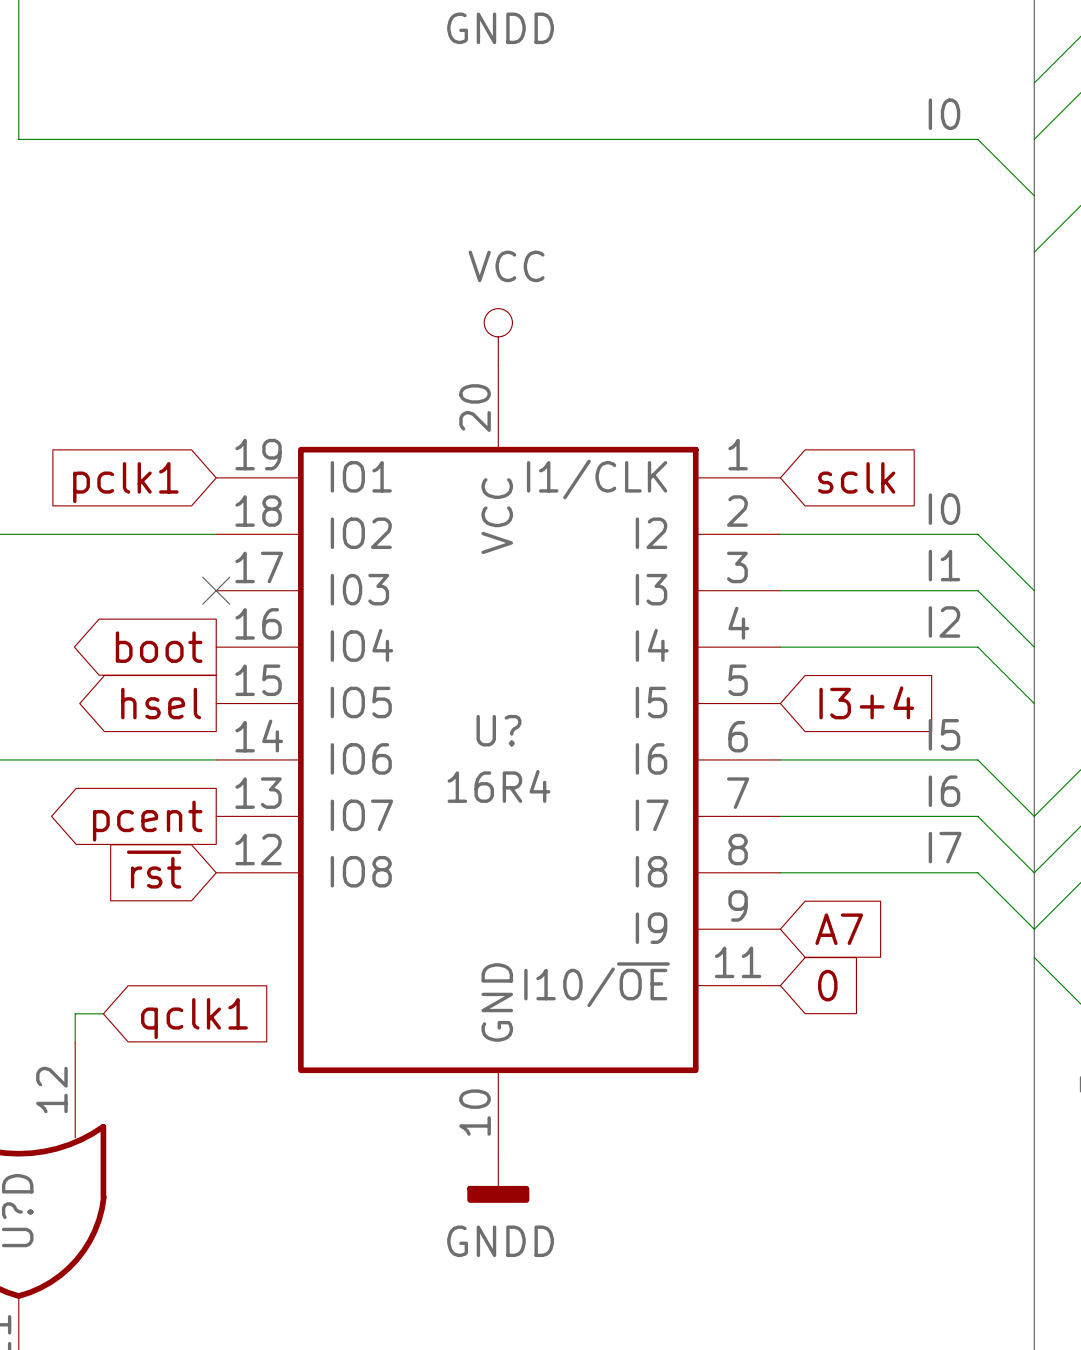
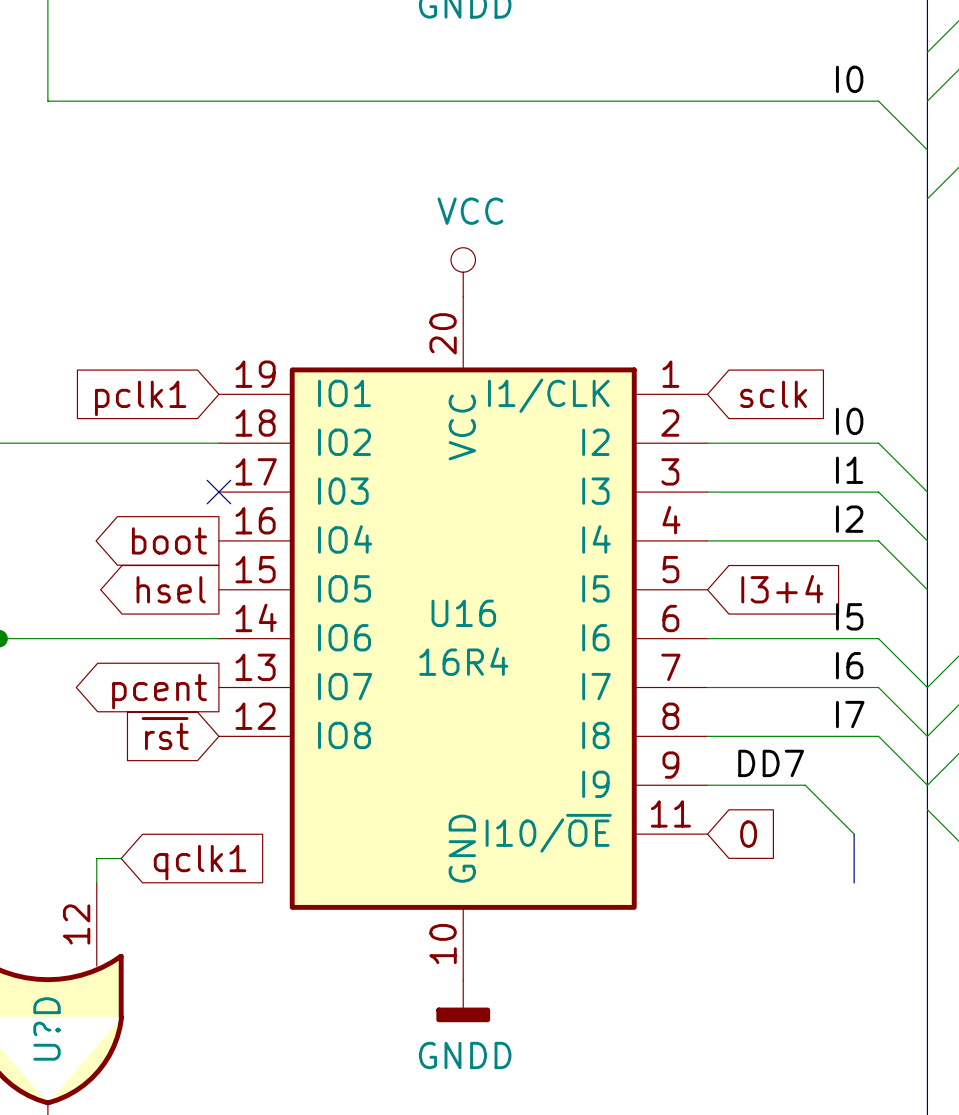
U? name: U? (498, 730) -> U16 (463, 613)
label: none -> DD7 (771, 763)
wire: none -> (707, 785) (805, 785) (854, 834)
global label: A7 (839, 929) -> none
bus: none -> (854, 834) (854, 882)

